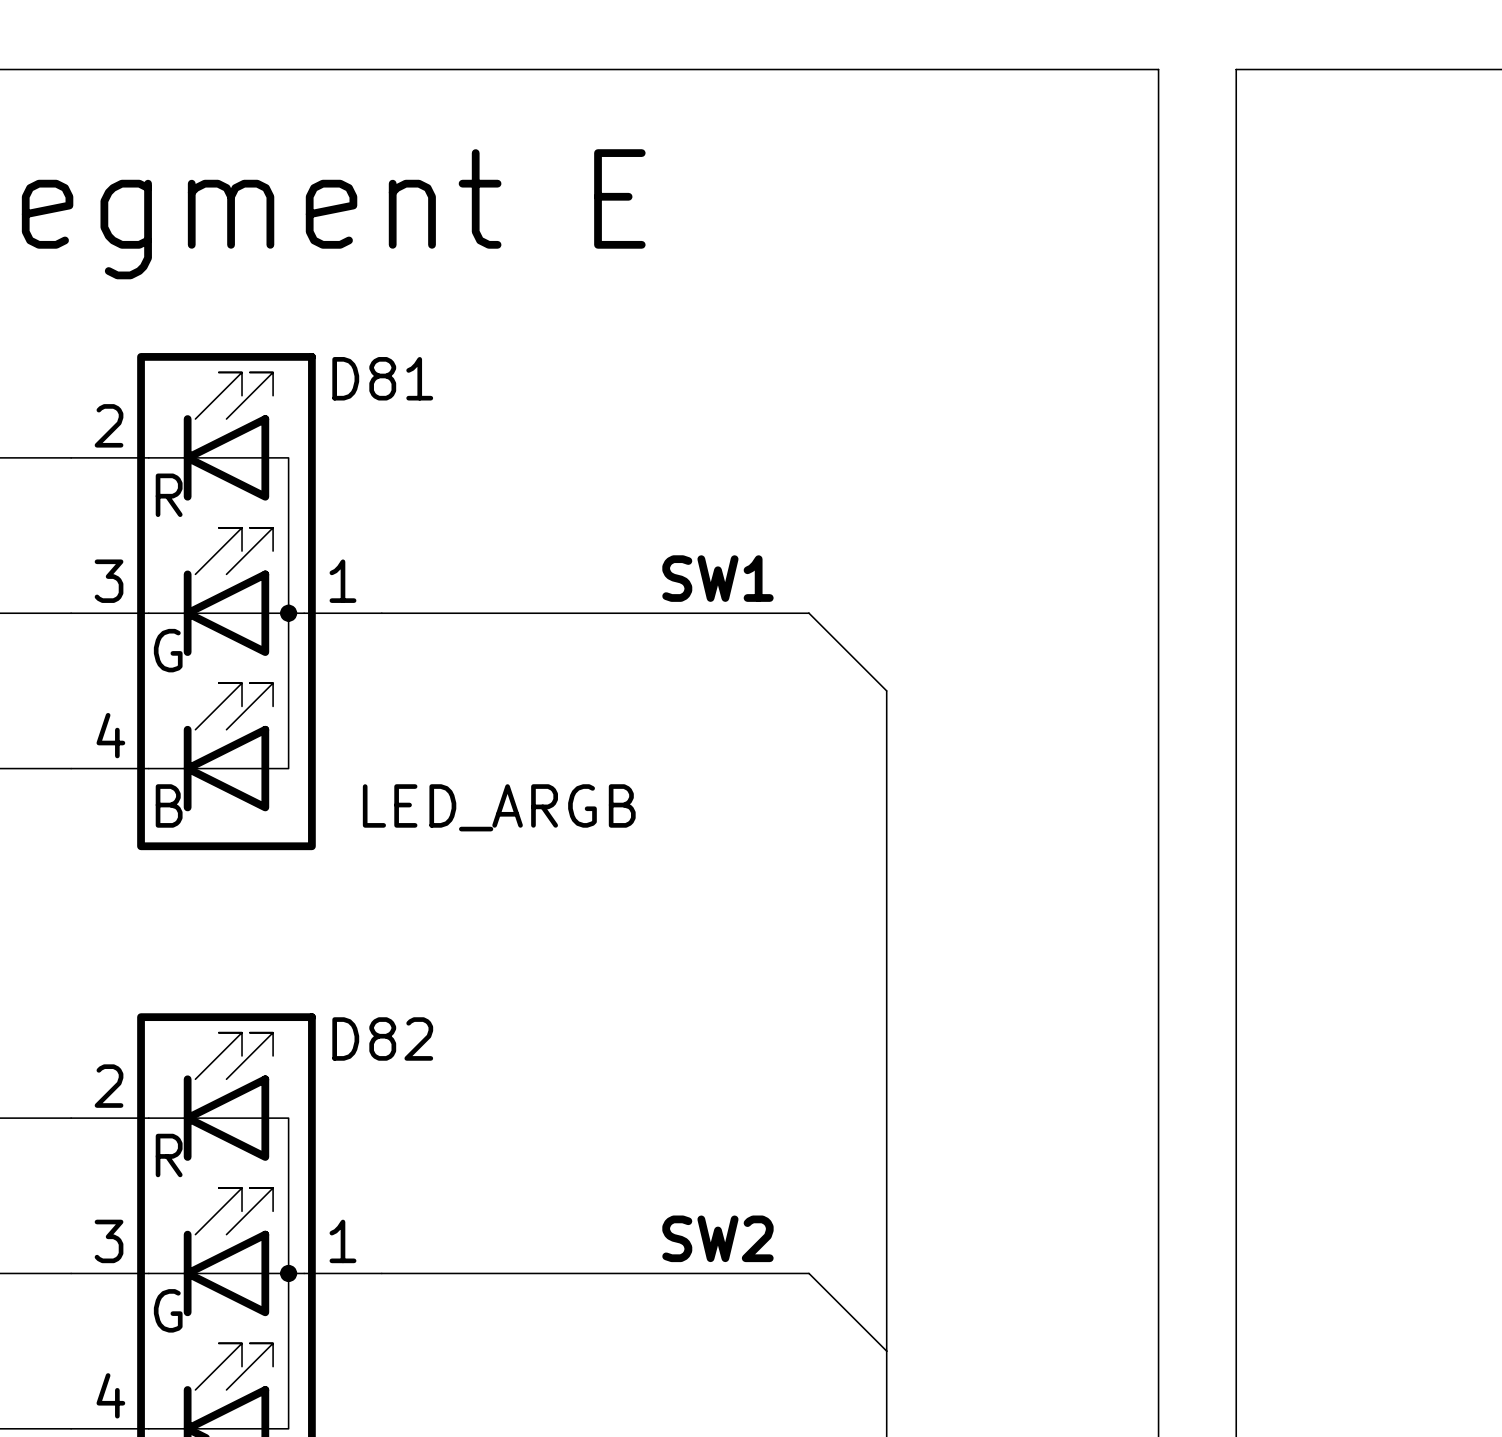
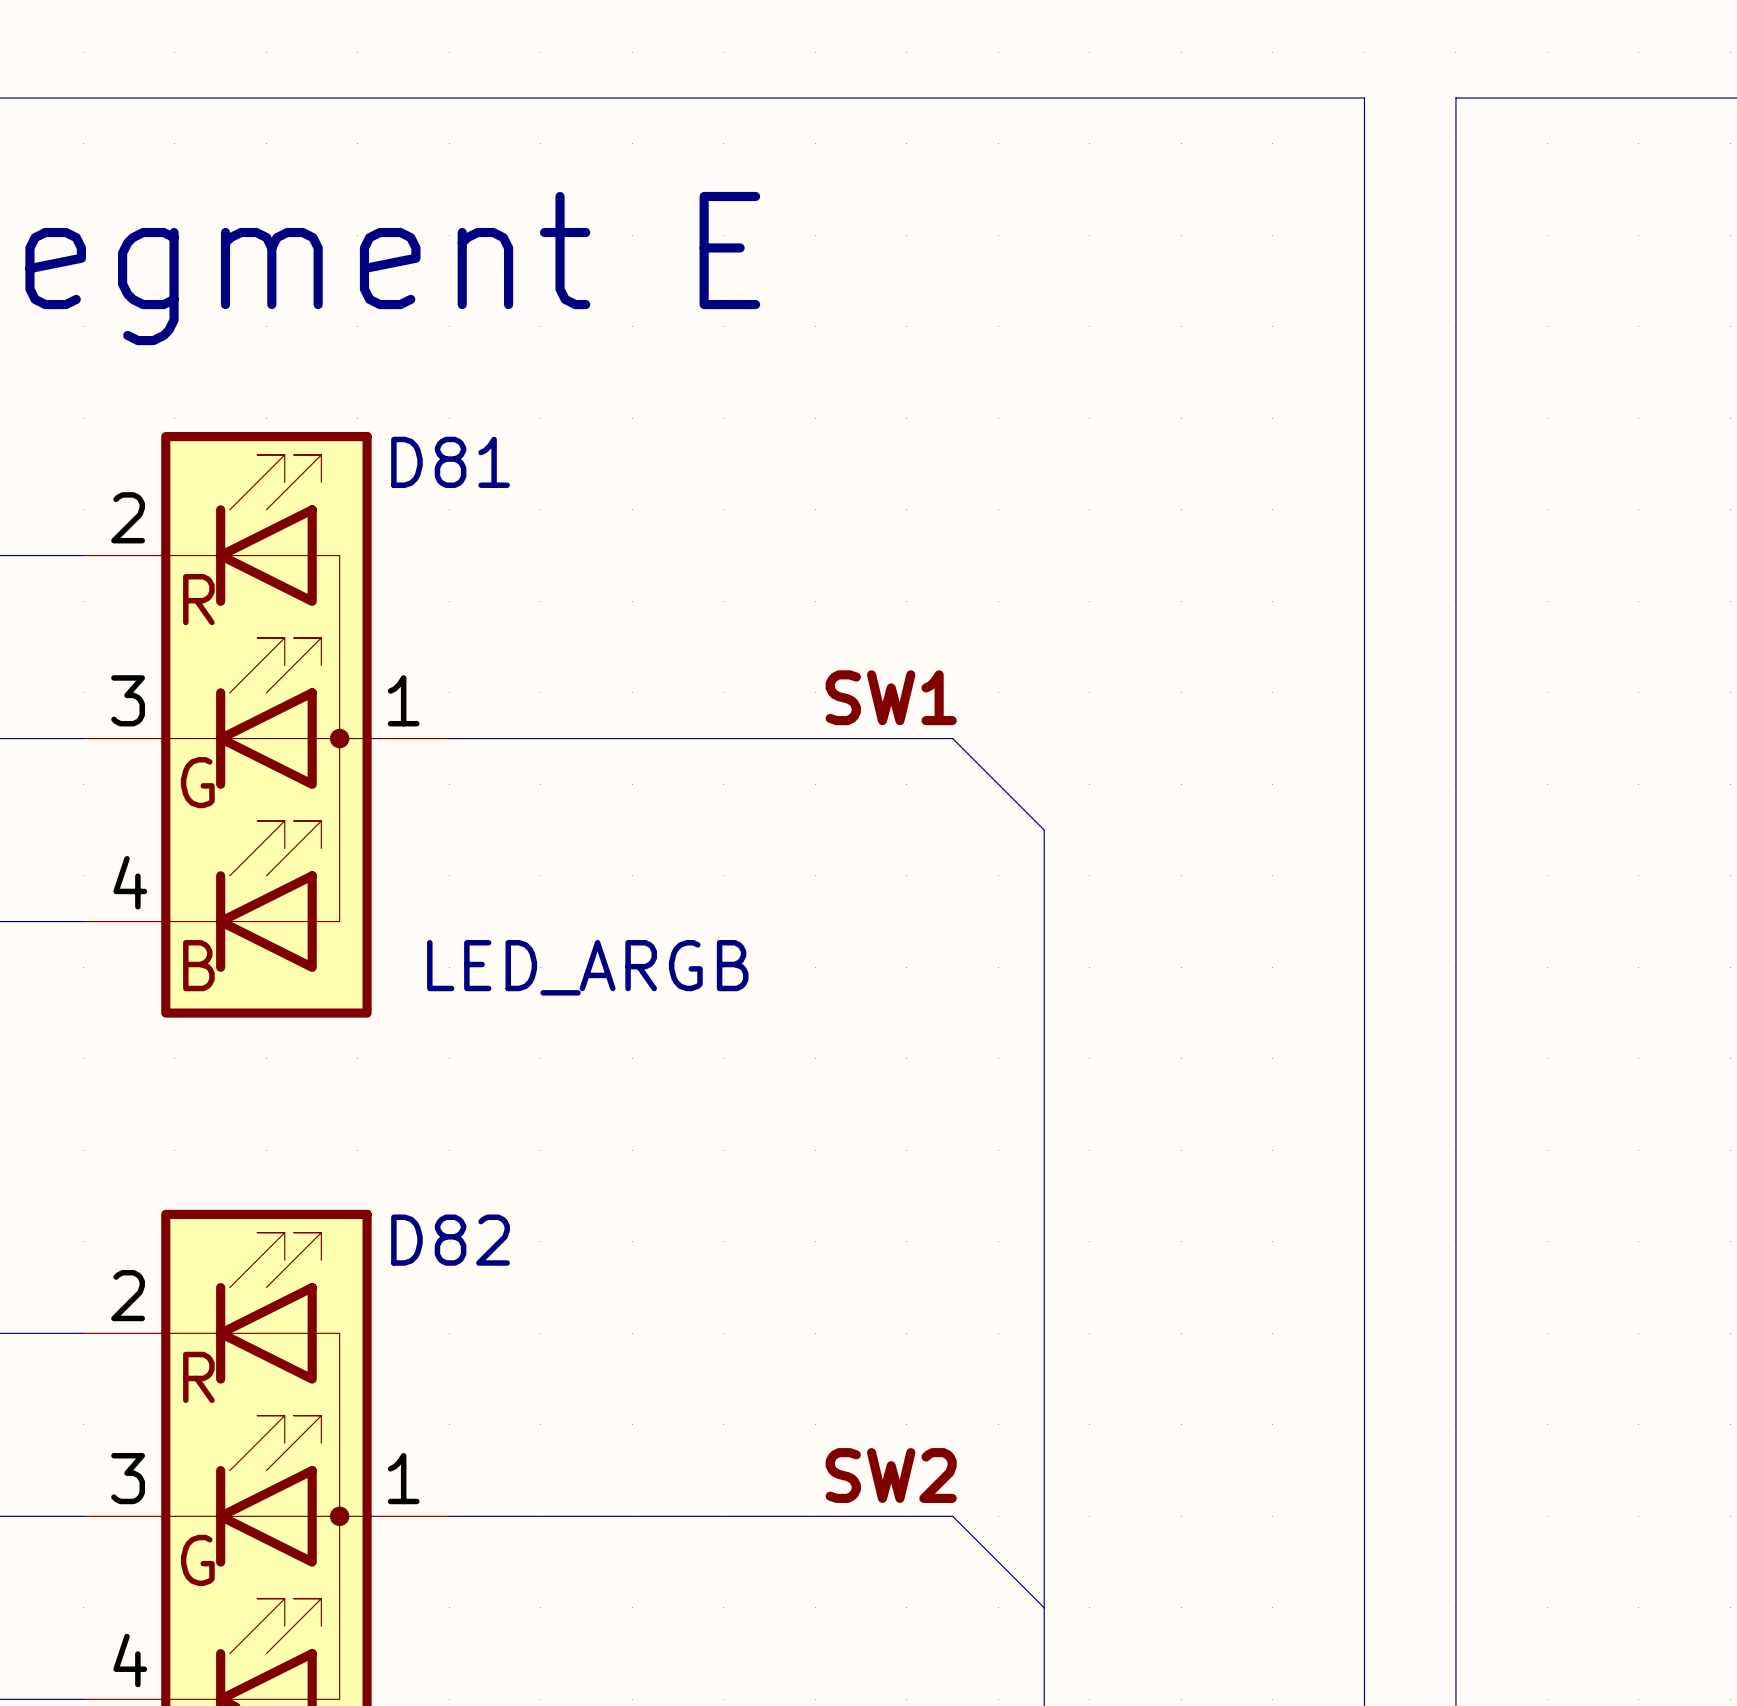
label position: SW1 (717, 578) -> SW1 (891, 697)
label position: SW2 (717, 1238) -> SW2 (891, 1475)

